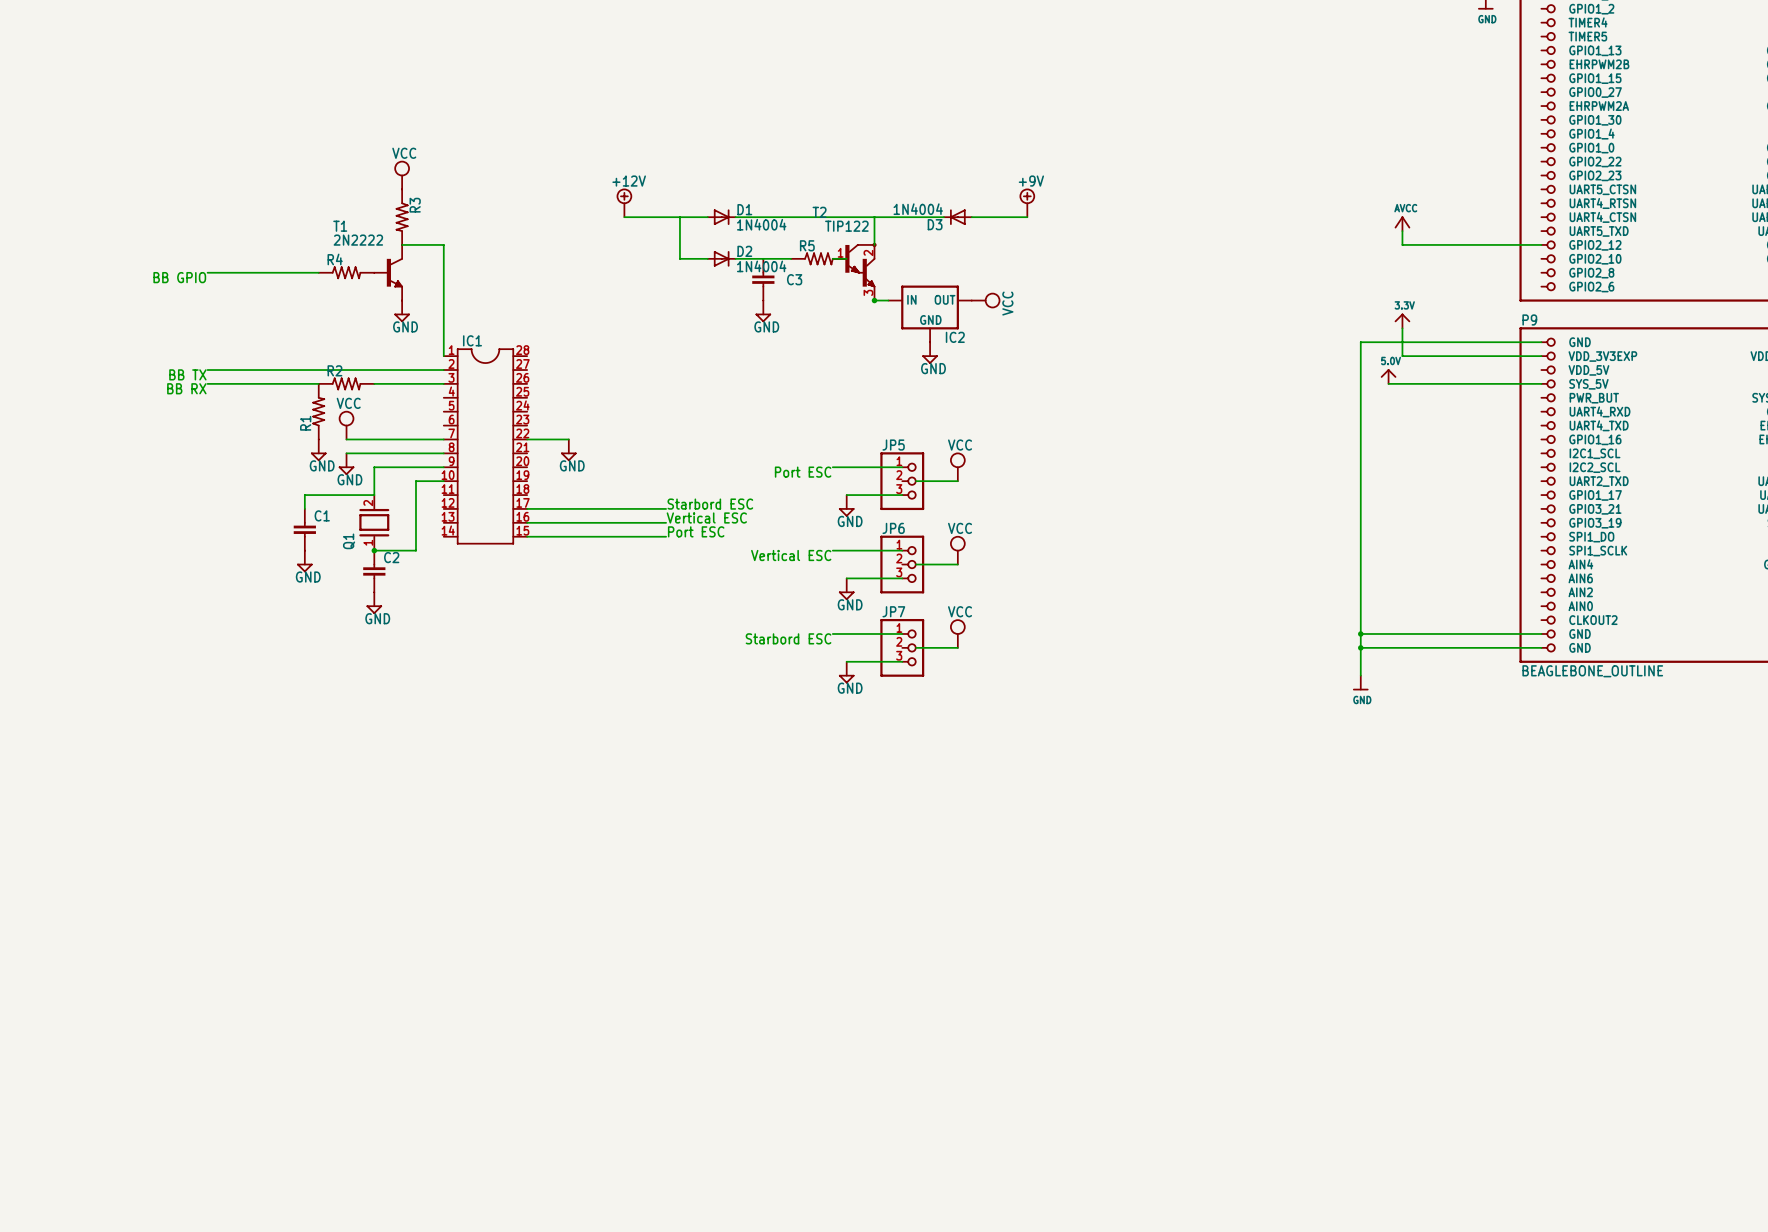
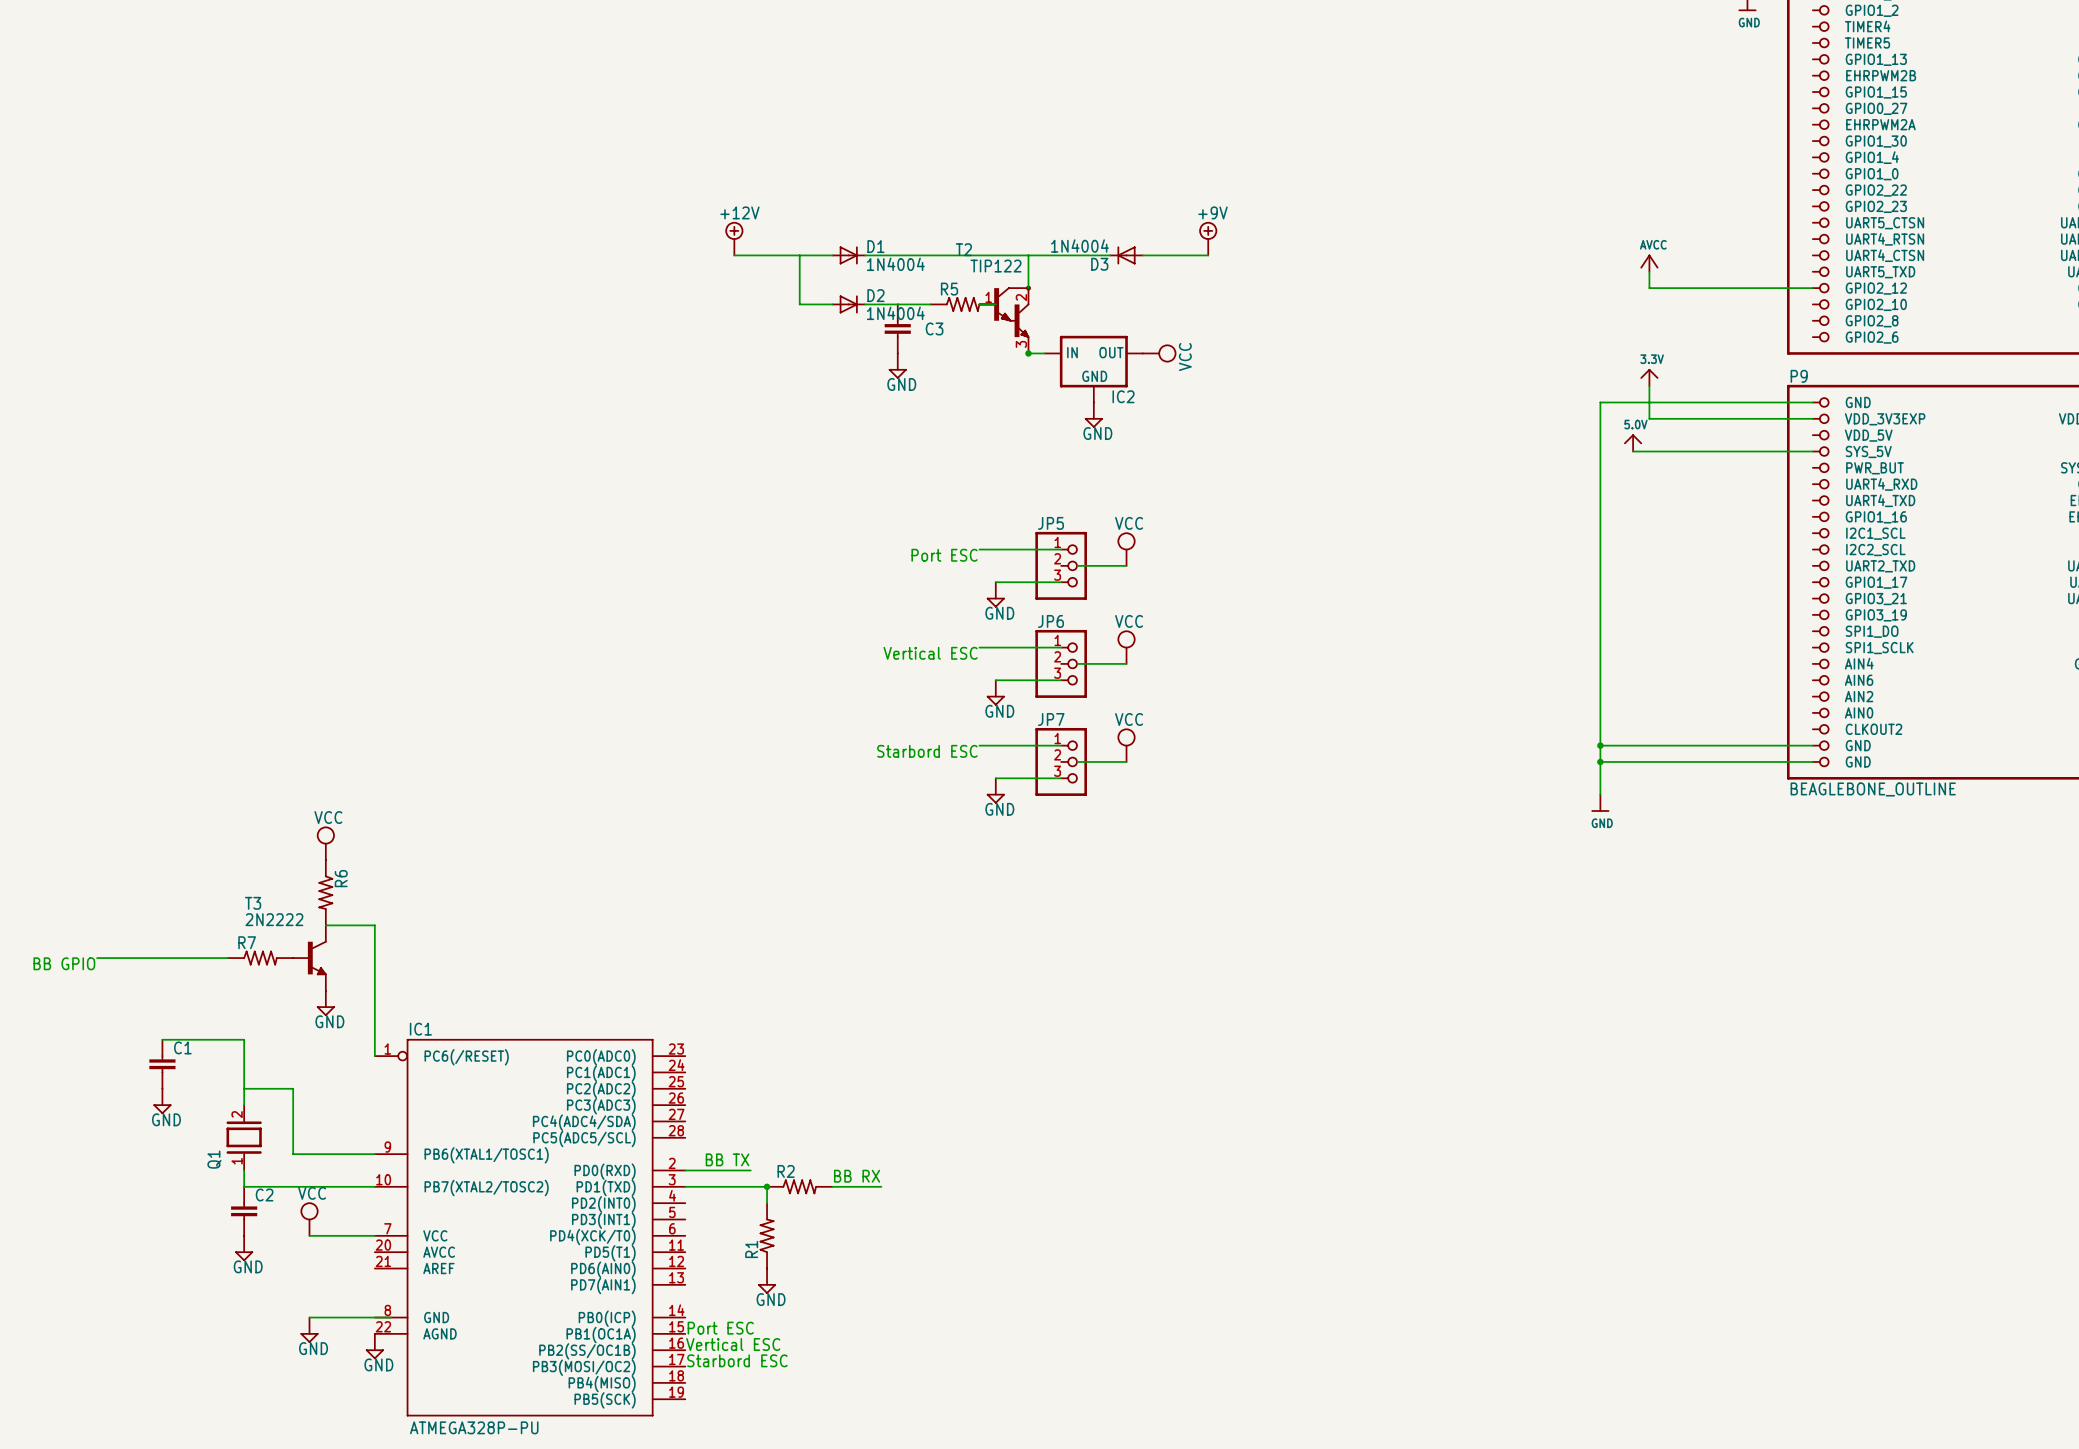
power symbol: VCC (402, 175) -> none
R3: (402, 217) -> none
wire: (402, 244) (443, 244) (443, 356) -> none
wire: (207, 272) (318, 272) -> none
R4: (346, 272) -> none
T1: 2N2222 (388, 272) -> none
text: BB GPIO (179, 277) -> none
power symbol: GND (402, 311) -> none
IC1 name position: IC1 (472, 340) -> IC1 (420, 1029)
IC1 symbol: [443, 348, 528, 545] -> [374, 1038, 686, 1417]
wire: (207, 370) (443, 370) -> none
text: BB TX (187, 374) -> none
wire: (207, 383) (318, 383) -> none
R2 position: (346, 383) -> (799, 1186)
wire: (374, 383) (443, 383) -> none
text: BB RX (186, 388) -> none
R1 position: (318, 411) -> (767, 1235)
power symbol: VCC (346, 425) -> none
wire: (346, 439) (443, 439) -> none
wire: (527, 439) (568, 439) -> none
power symbol: GND (318, 450) -> none
power symbol: GND (568, 450) -> none
wire: (346, 453) (443, 453) -> none
power symbol: GND (346, 464) -> none
wire: (443, 467) (374, 467) (374, 495) (304, 495) (304, 508) -> none
wire: (443, 481) (415, 481) (415, 550) (374, 550) -> none
text: Starbord ESC (710, 504) -> none
wire: (527, 508) (666, 508) -> none
text: Vertical ESC (706, 517) -> none
Q1 position: (374, 522) -> (244, 1137)
wire: (527, 522) (666, 522) -> none
C1 position: (304, 529) -> (162, 1064)
text: Port ESC (696, 531) -> none
wire: (527, 536) (666, 536) -> none
junction: (374, 550) -> none
power symbol: GND (304, 561) -> none
C2 position: (374, 571) -> (244, 1211)
power symbol: GND (374, 603) -> none
power symbol: none -> VCC (325, 843)
R6: none -> (325, 892)
wire: none -> (325, 925) (374, 925) (374, 1056)
wire: none -> (97, 958) (227, 958)
R7: none -> (260, 958)
T3: none -> 2N2222 (309, 958)
text: none -> BB GPIO (64, 963)
power symbol: none -> GND (325, 1003)
wire: none -> (162, 1039) (244, 1039) (244, 1105)
wire: none -> (244, 1088) (293, 1088) (293, 1154) (374, 1154)
power symbol: none -> GND (162, 1101)
text: none -> BB TX (727, 1159)
wire: none -> (244, 1170) (244, 1186) (374, 1186)
wire: none -> (685, 1170) (750, 1170)
text: none -> BB RX (857, 1176)
wire: none -> (685, 1186) (767, 1186) (767, 1203)
junction: none -> (767, 1186)
wire: none -> (832, 1186) (881, 1186)
power symbol: none -> VCC (309, 1219)
wire: none -> (309, 1235) (374, 1235)
power symbol: none -> GND (244, 1248)
power symbol: none -> GND (767, 1281)
wire: none -> (309, 1317) (391, 1317)
text: none -> Port ESC (720, 1328)
power symbol: none -> GND (309, 1330)
text: none -> Vertical ESC (733, 1344)
power symbol: none -> GND (374, 1346)
text: none -> Starbord ESC (737, 1360)
IC1 value: none -> ATMEGA328P-PU (474, 1427)

